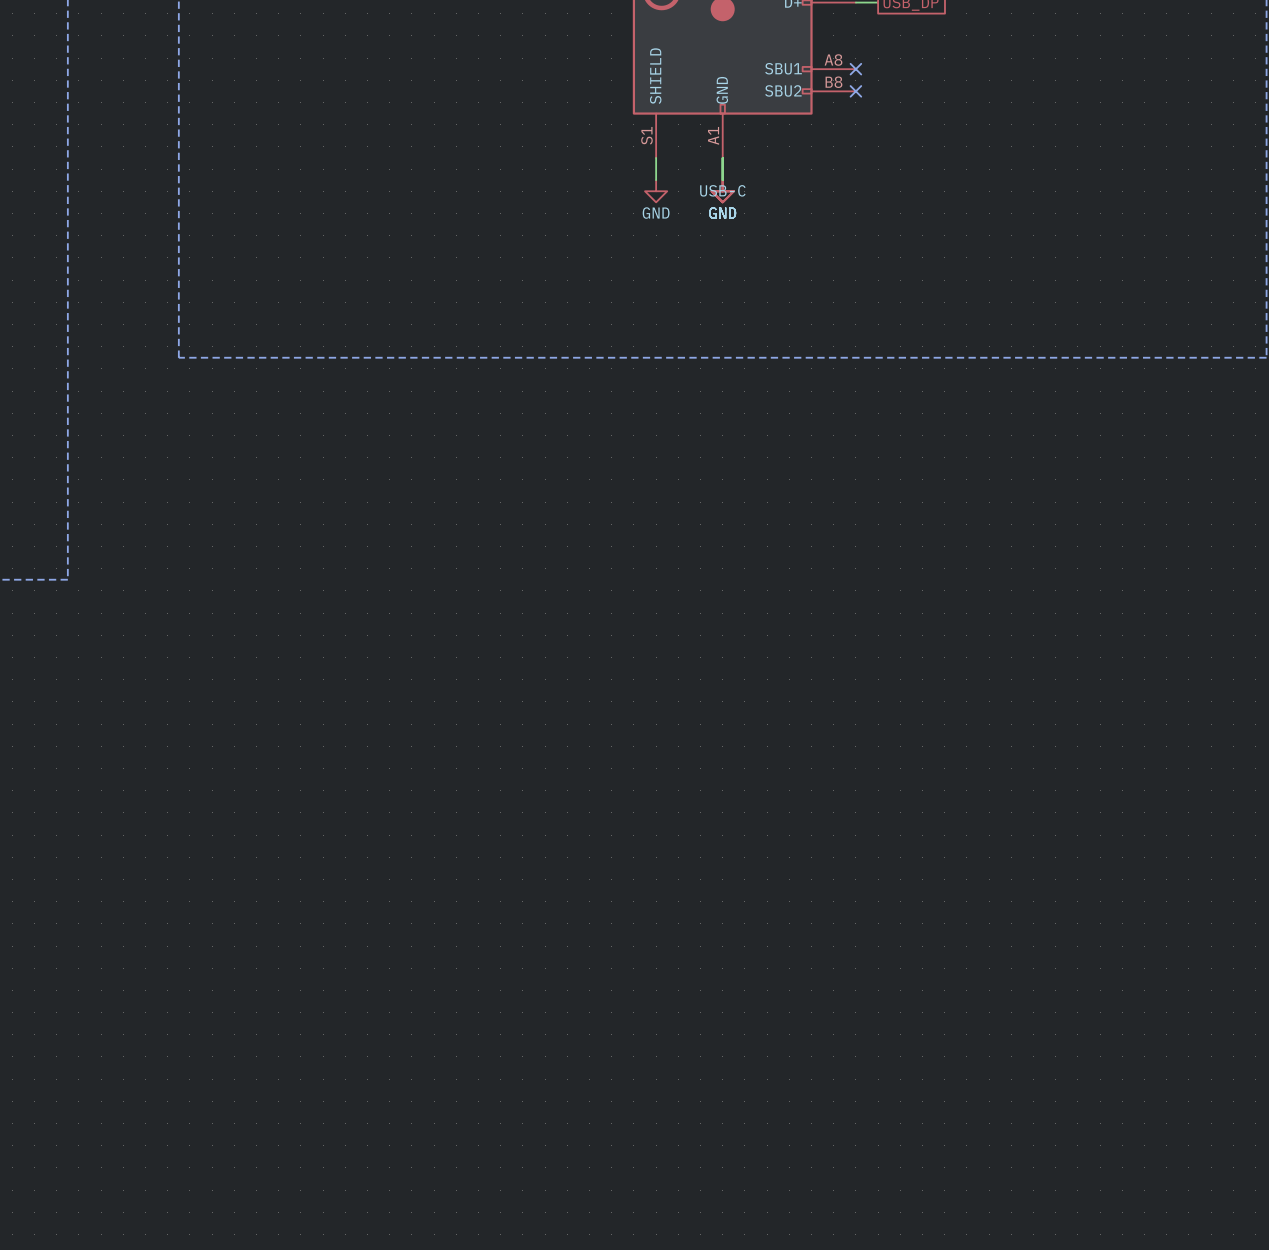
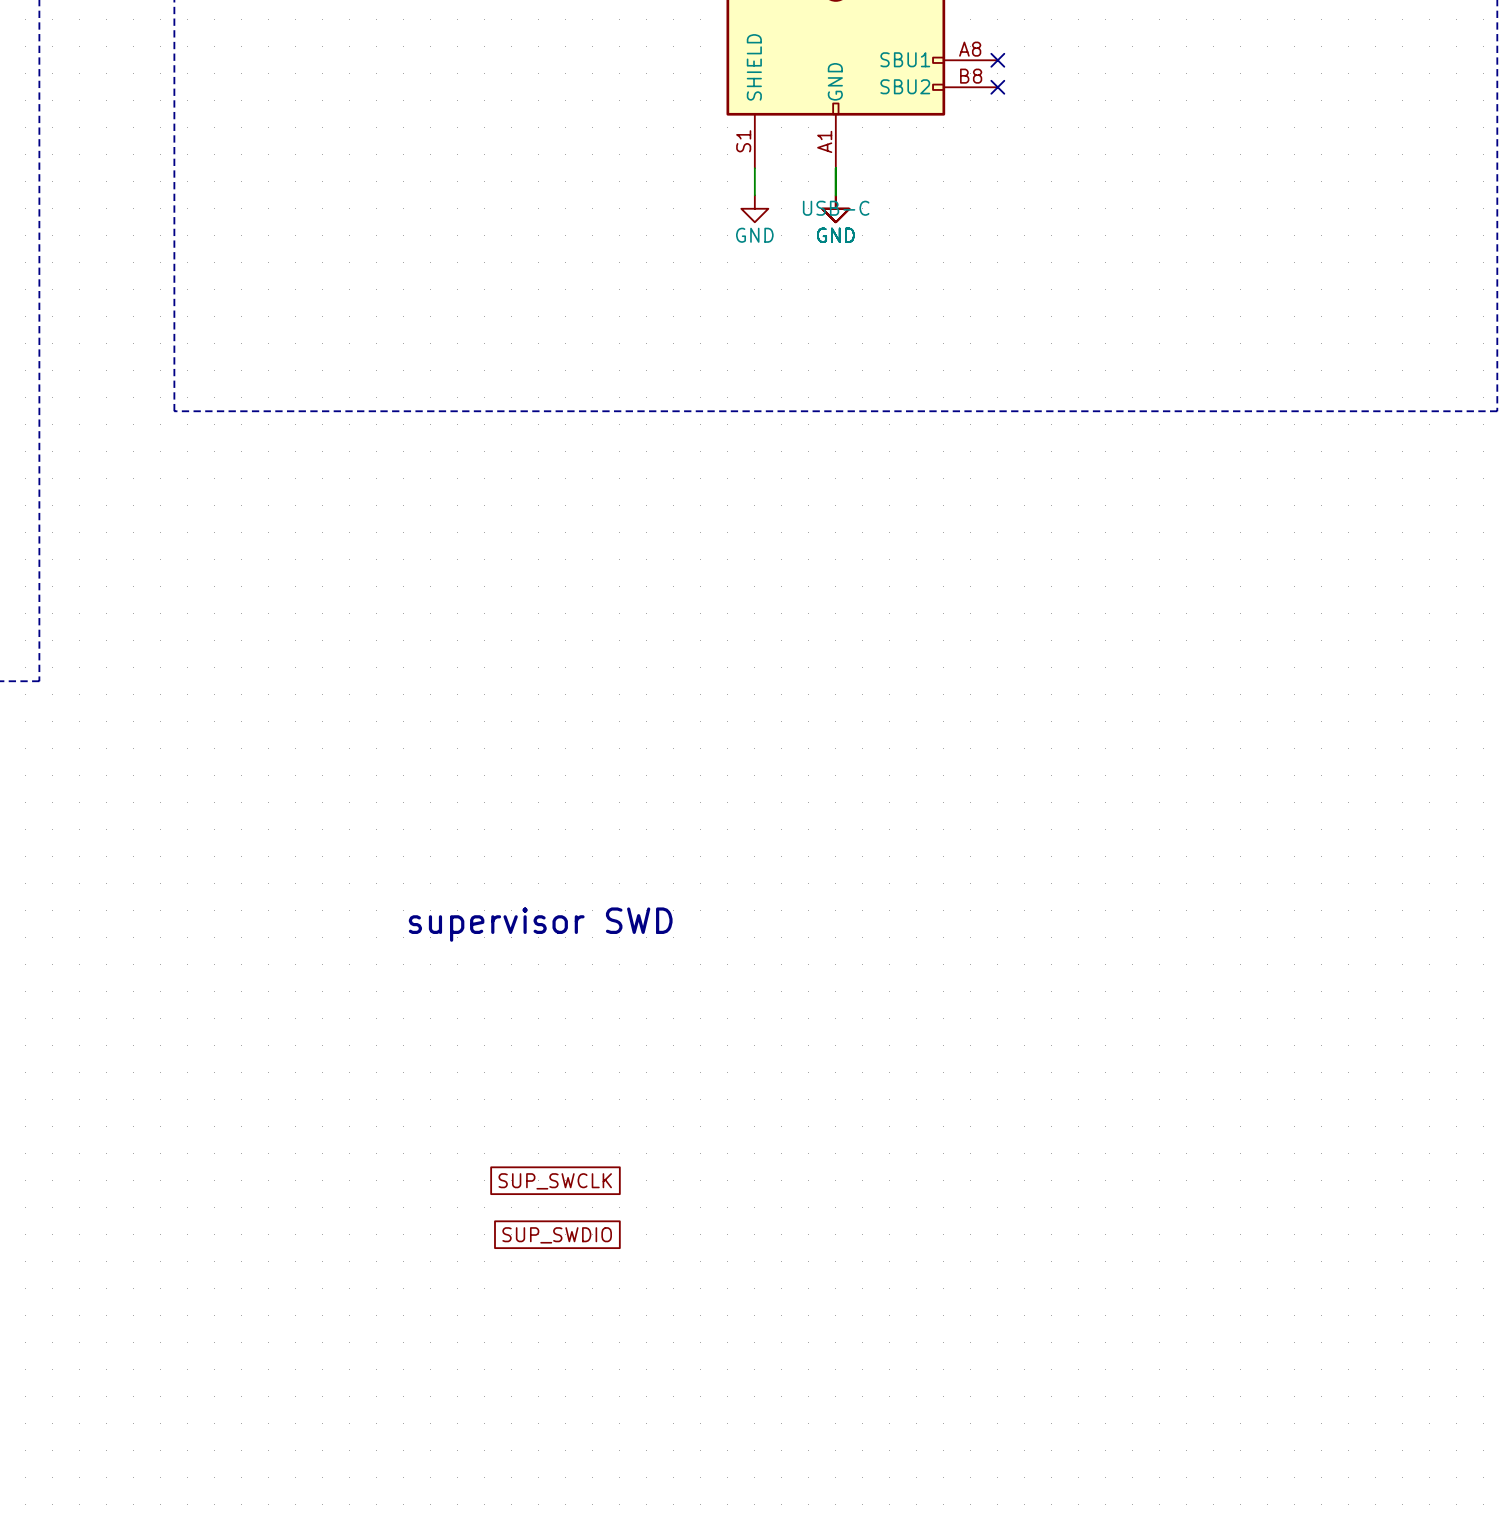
text: none -> supervisor SWD (540, 924)
global label: none -> SUP_SWCLK (555, 1181)
global label: none -> SUP_SWDIO (557, 1235)

